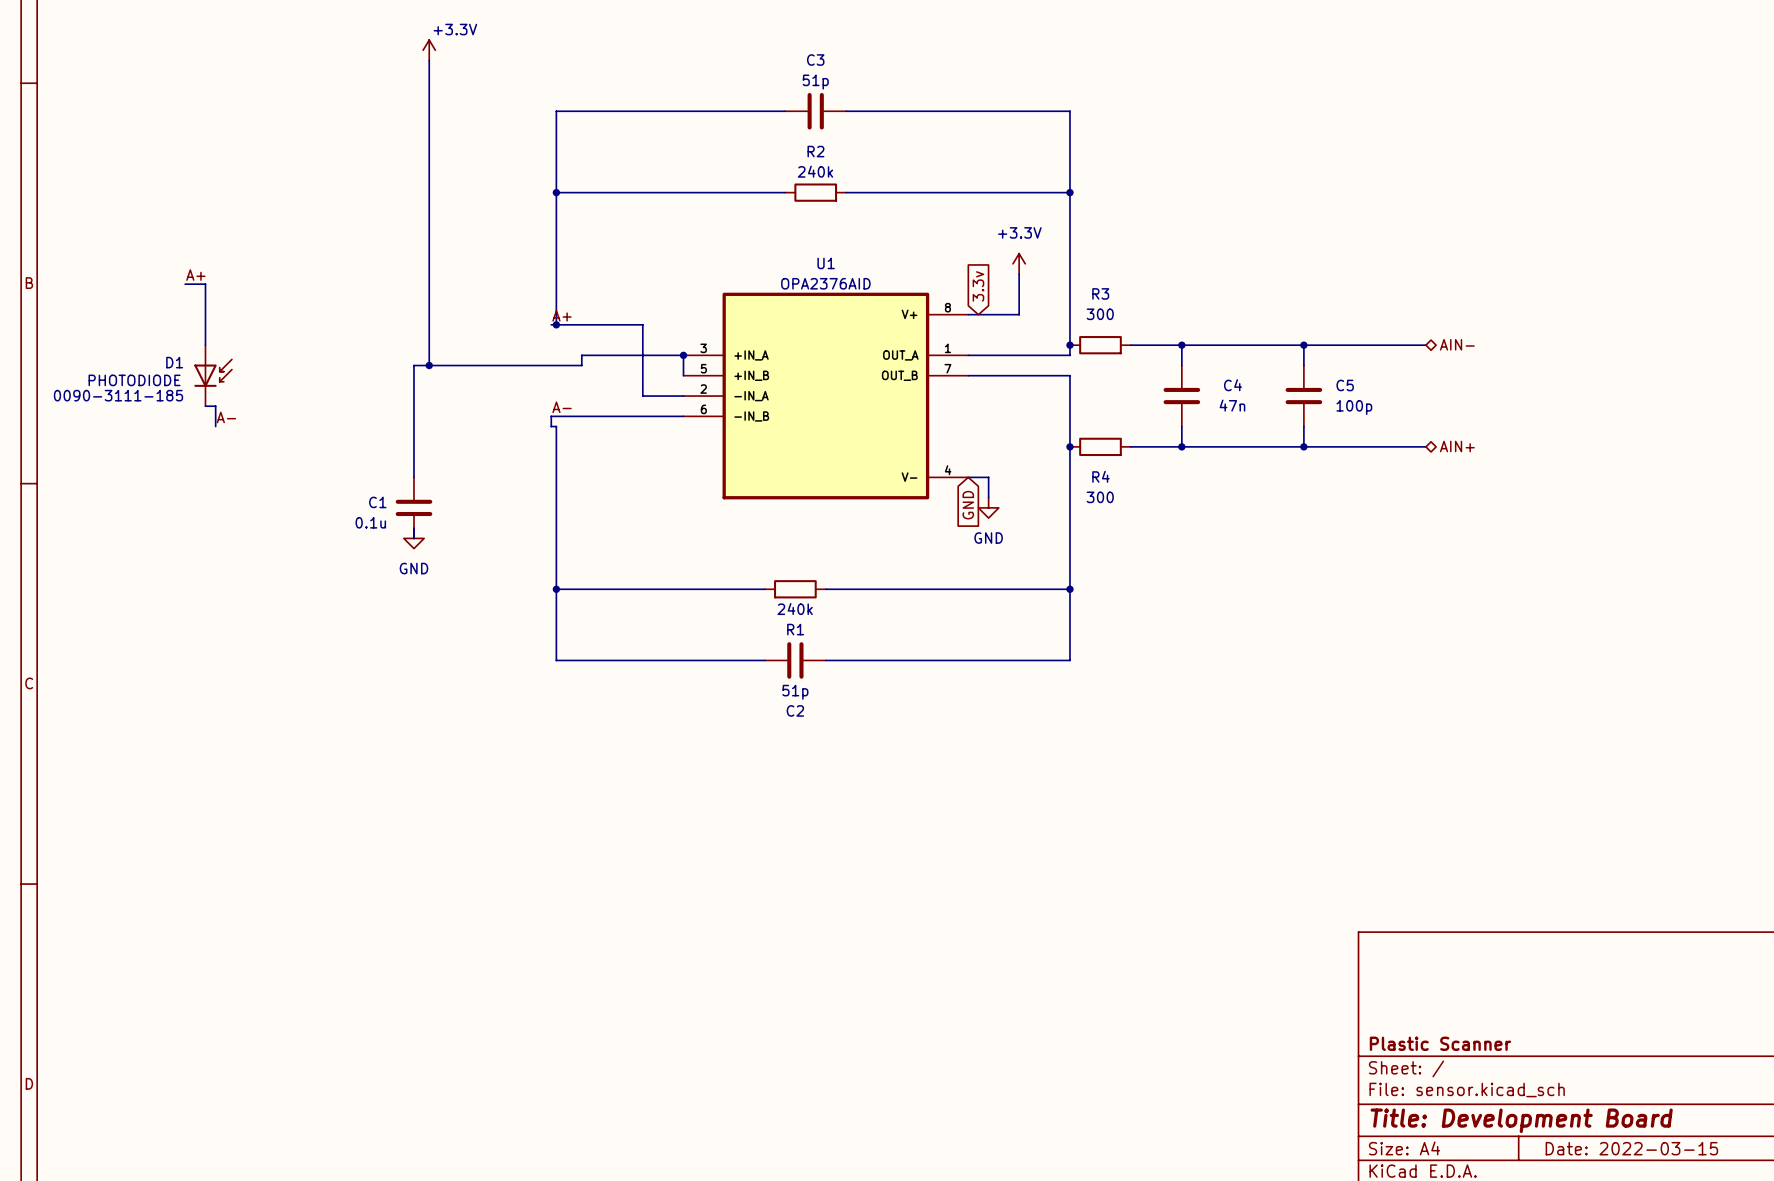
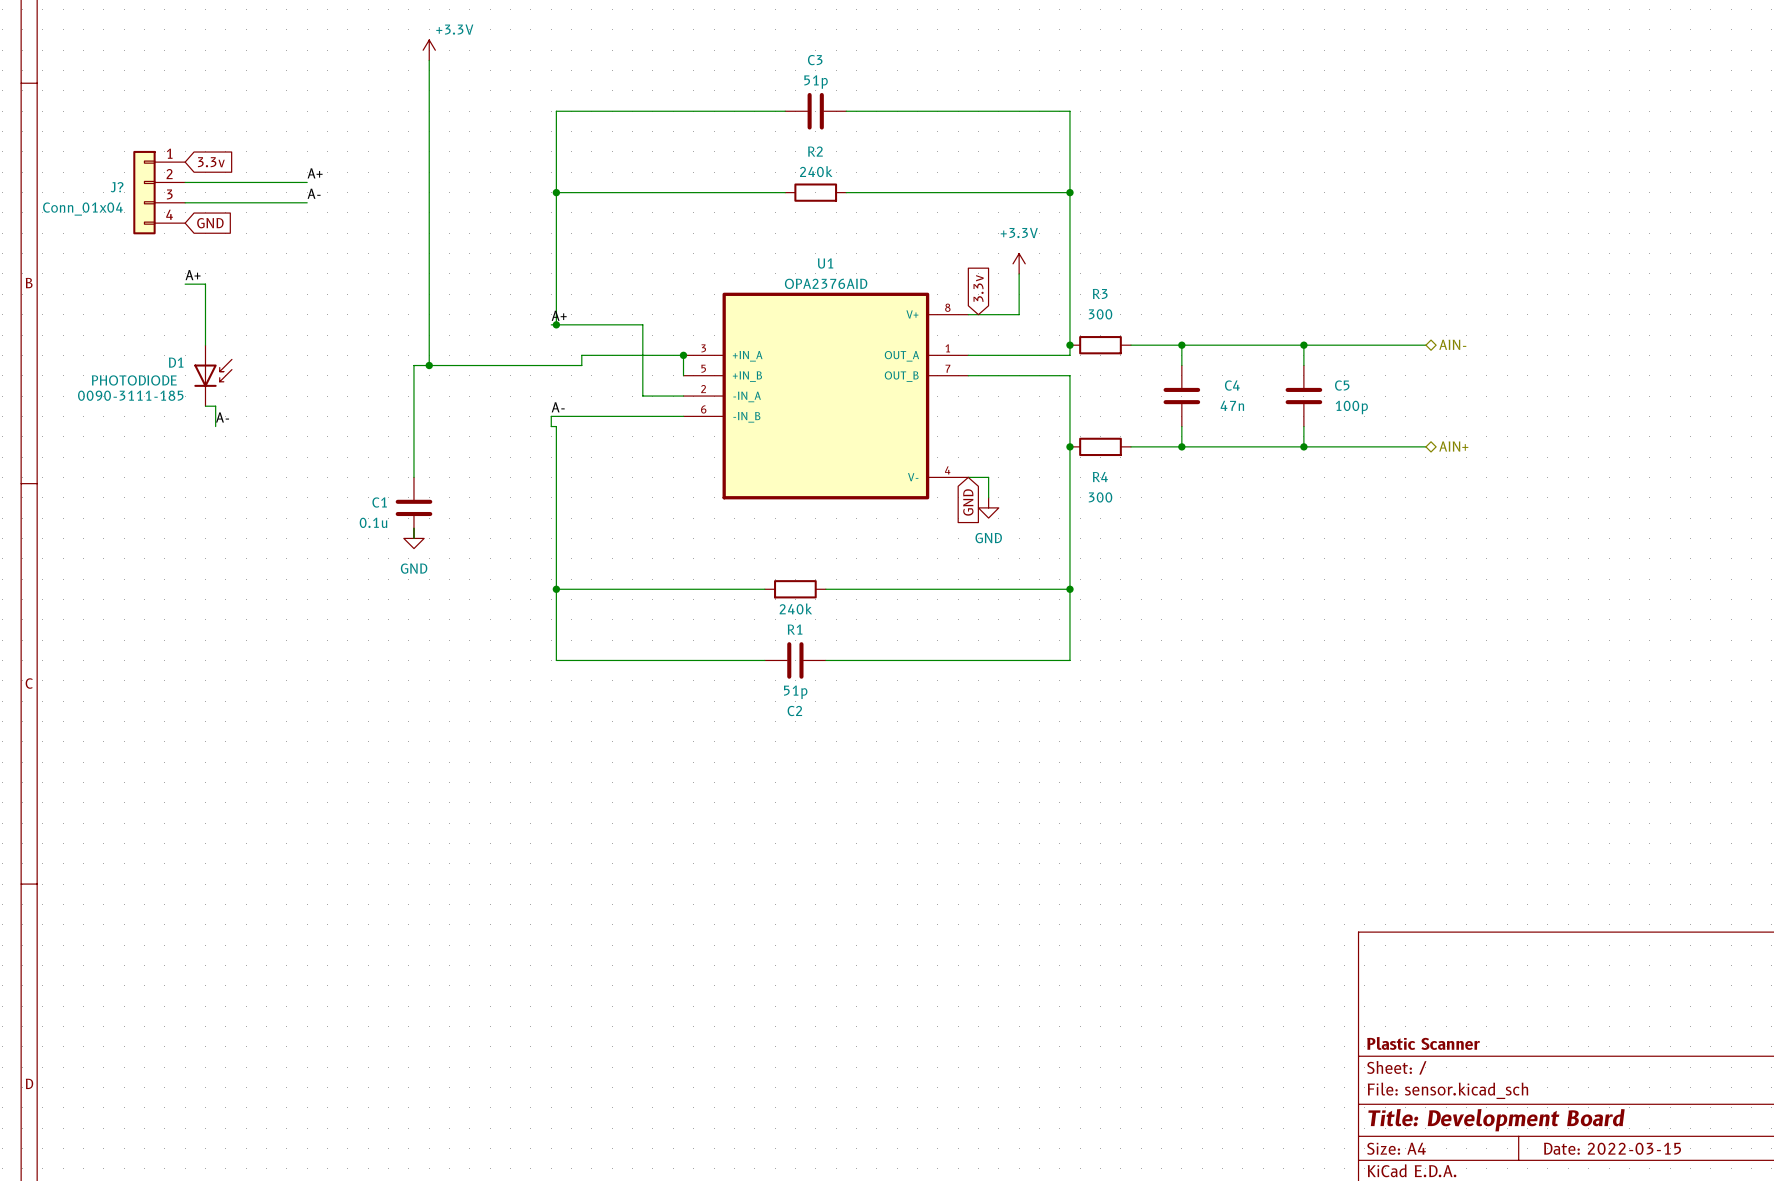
global label: none -> 3.3v (211, 162)
label: none -> A+ (315, 173)
wire: none -> (185, 182) (307, 182)
J?: none -> Conn_01x04 (159, 192)
label: none -> A- (314, 193)
wire: none -> (185, 202) (307, 202)
global label: none -> GND (210, 223)

